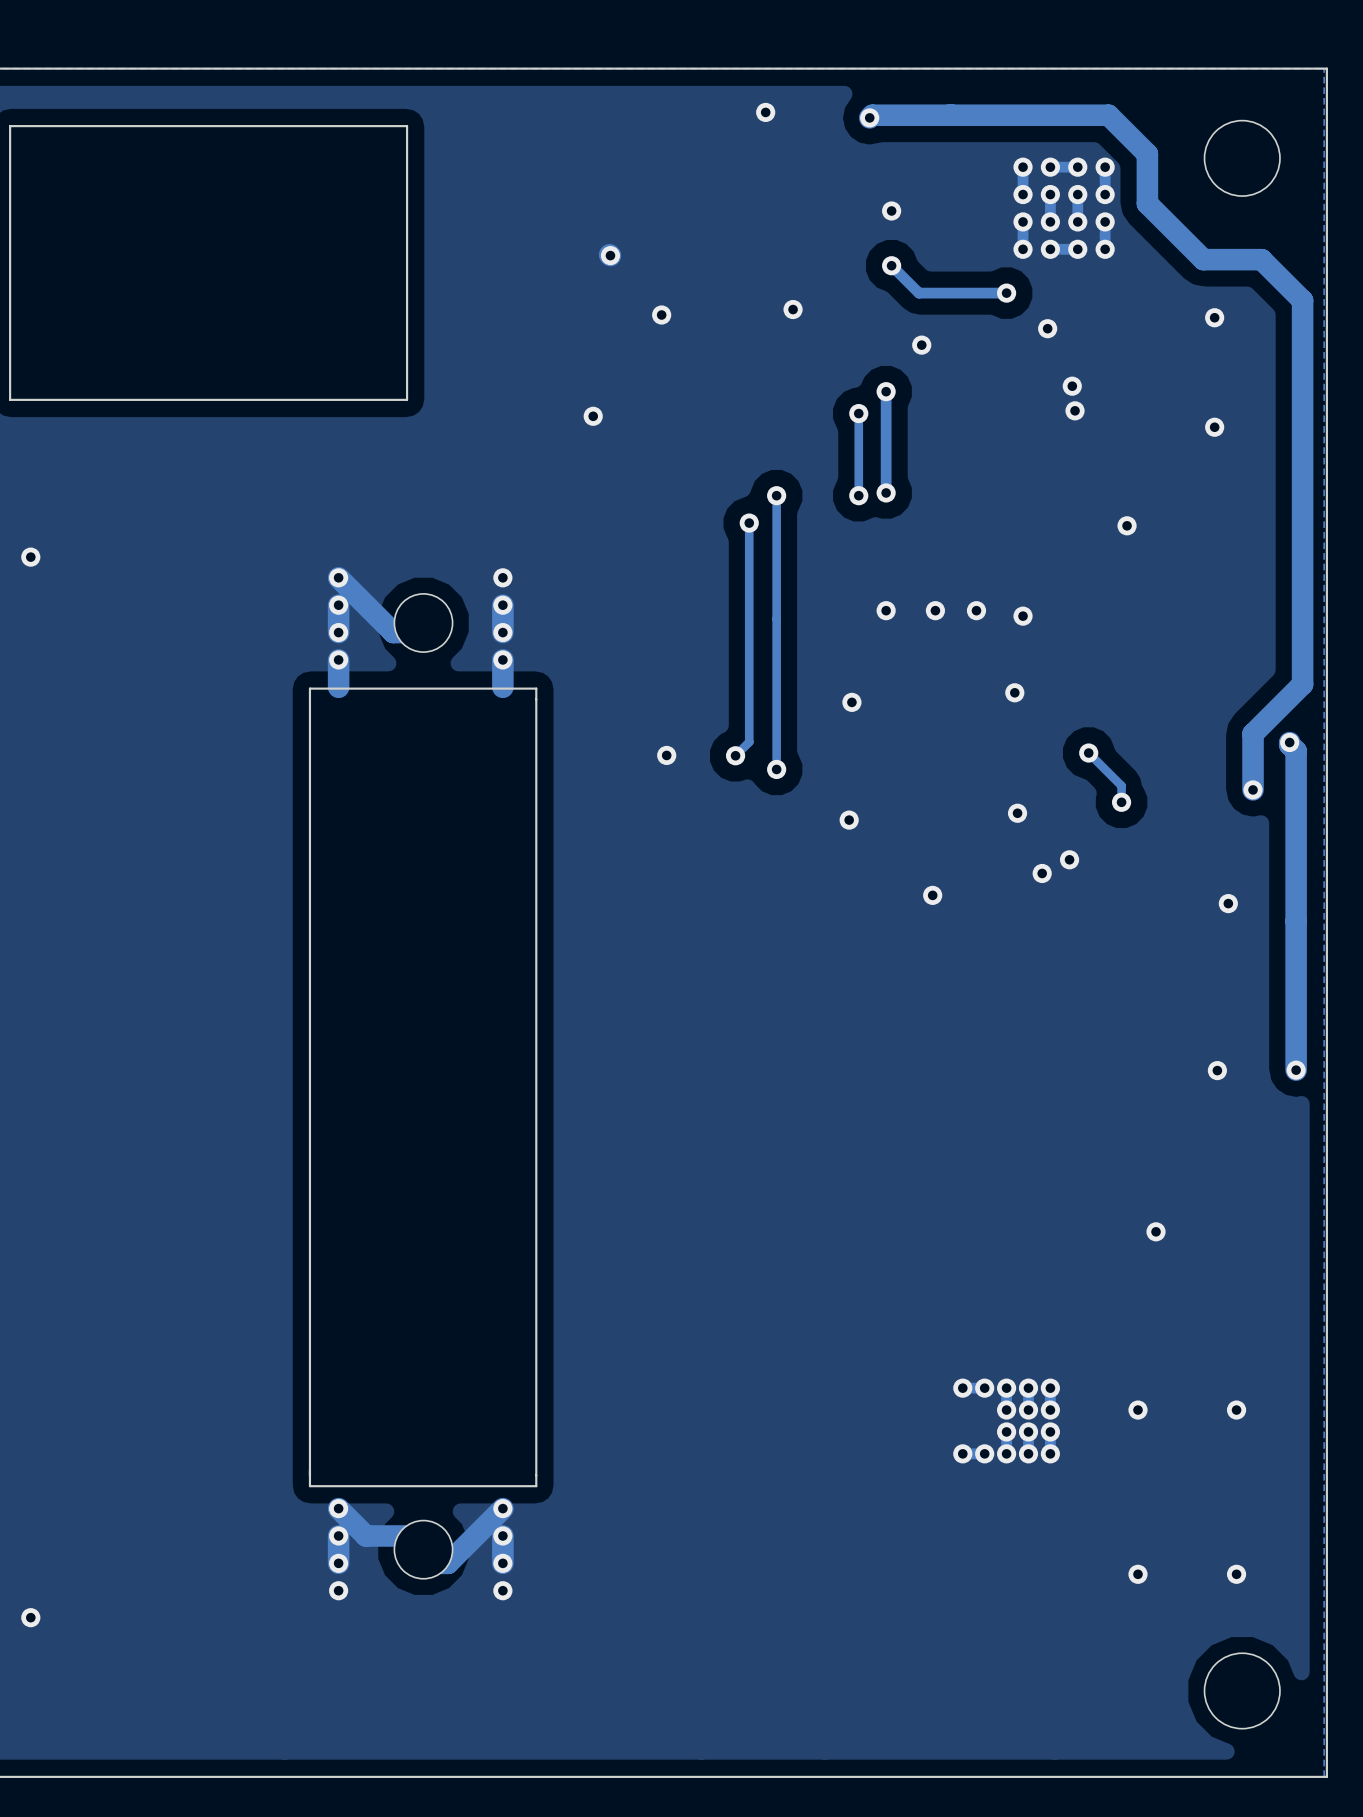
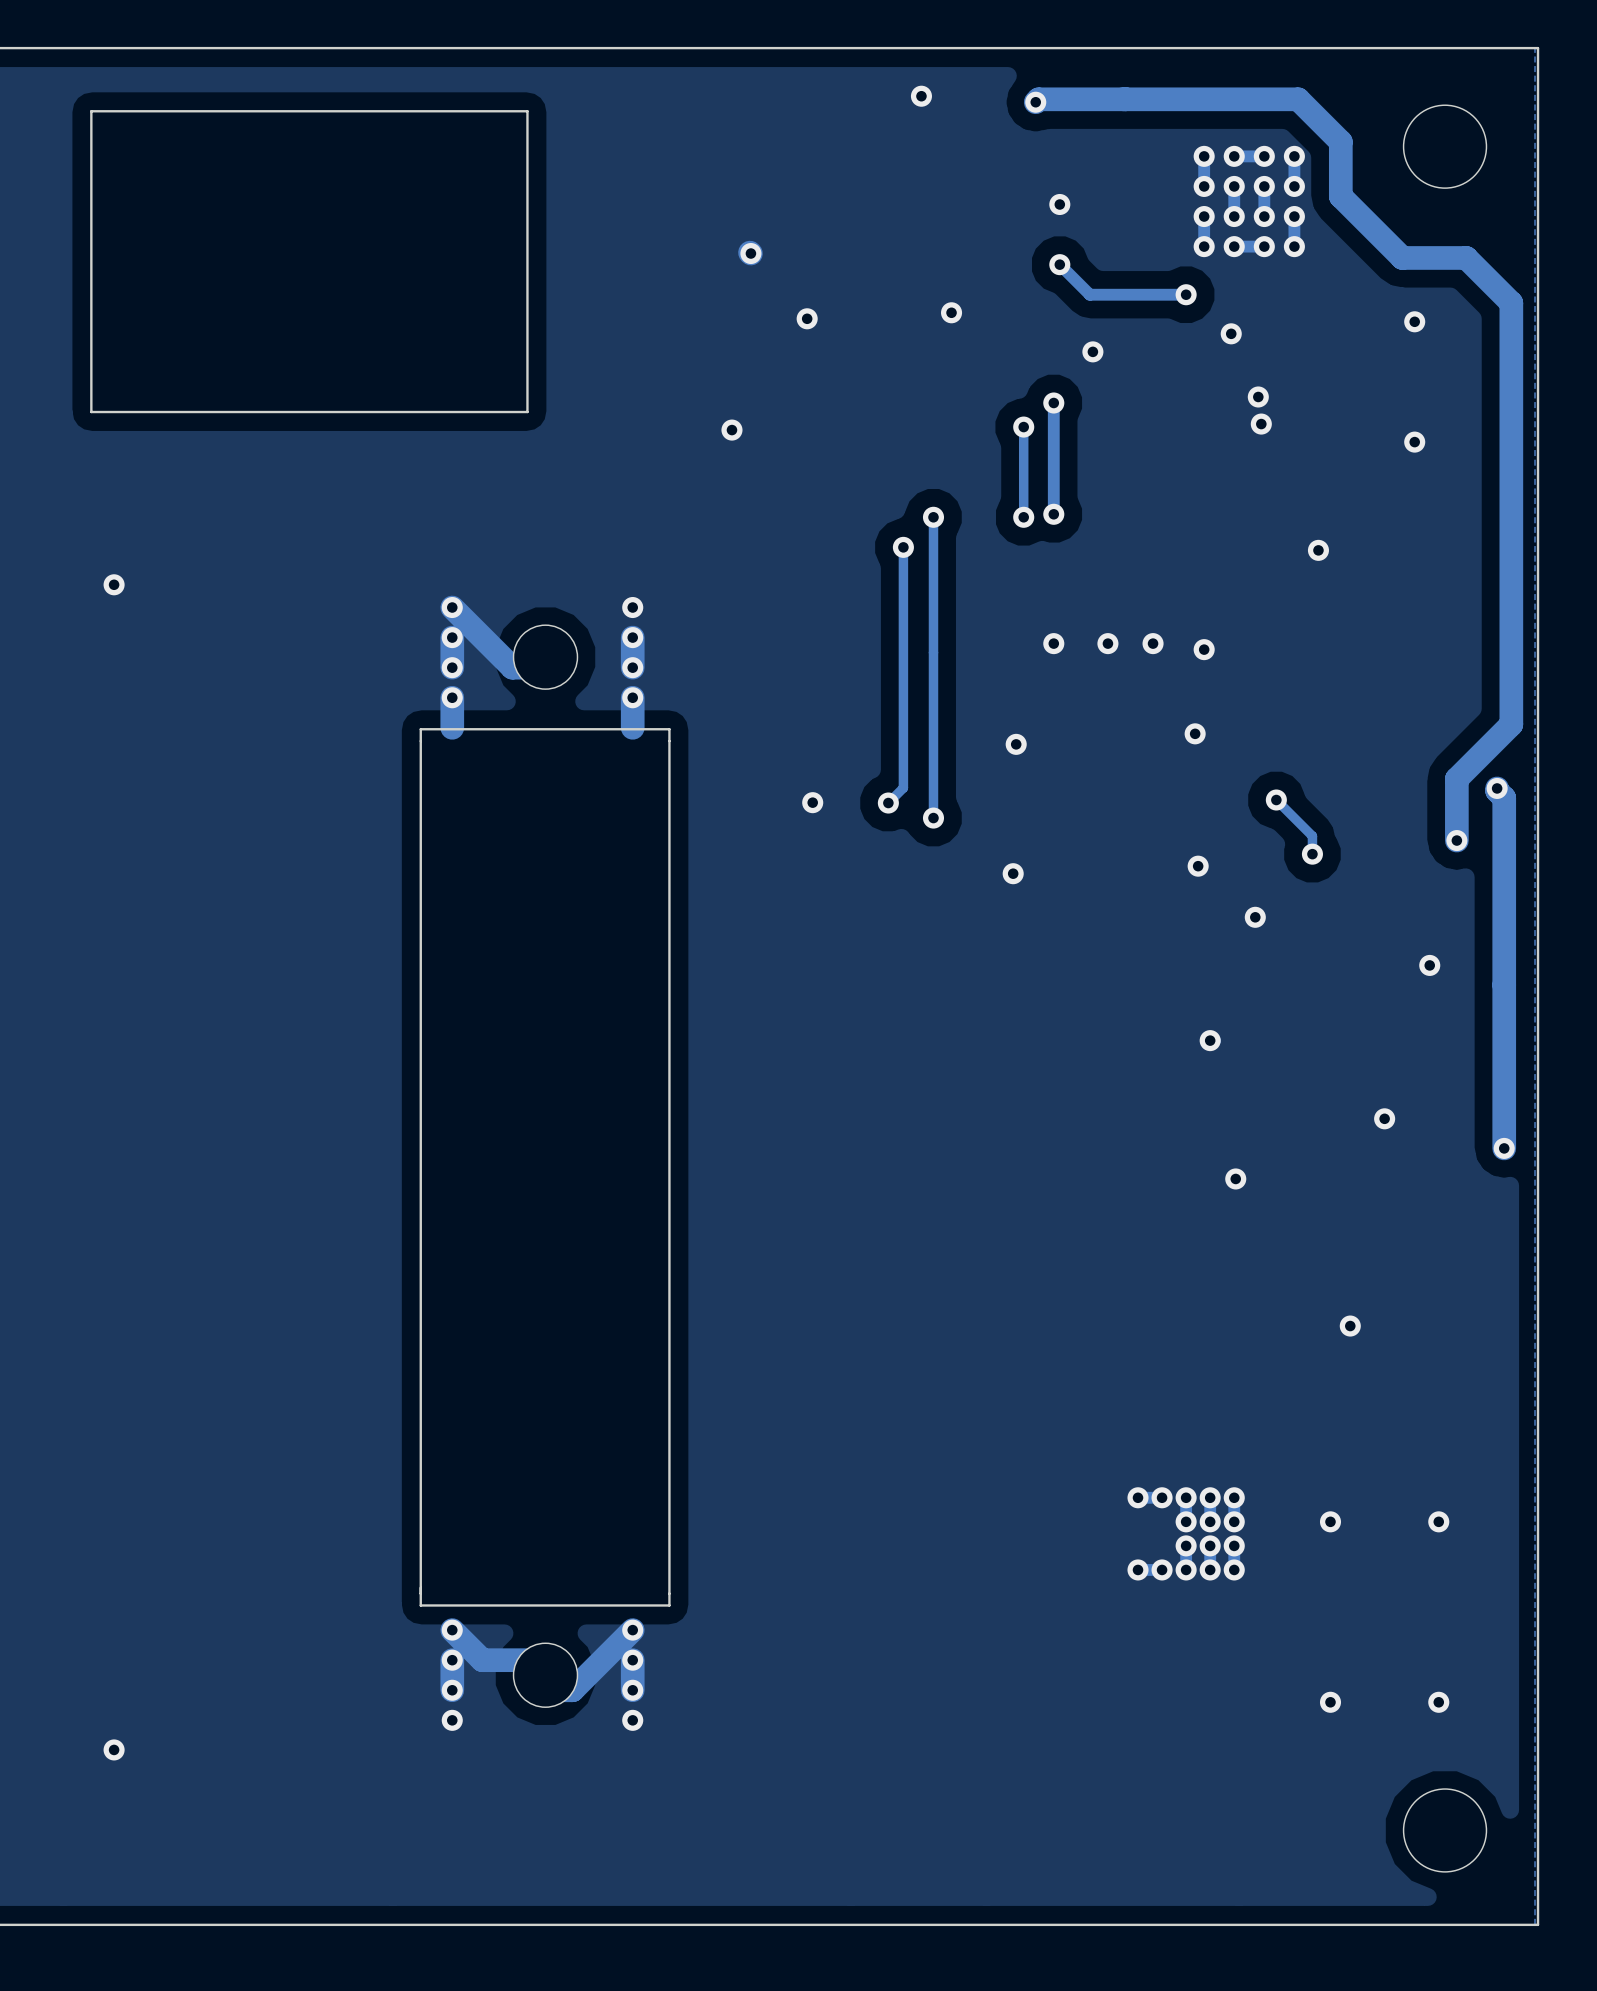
via: (1042, 873) -> none
via: (932, 895) -> none
via: none -> (1210, 1040)
via position: (1217, 1070) -> (1384, 1118)
via: none -> (1235, 1178)

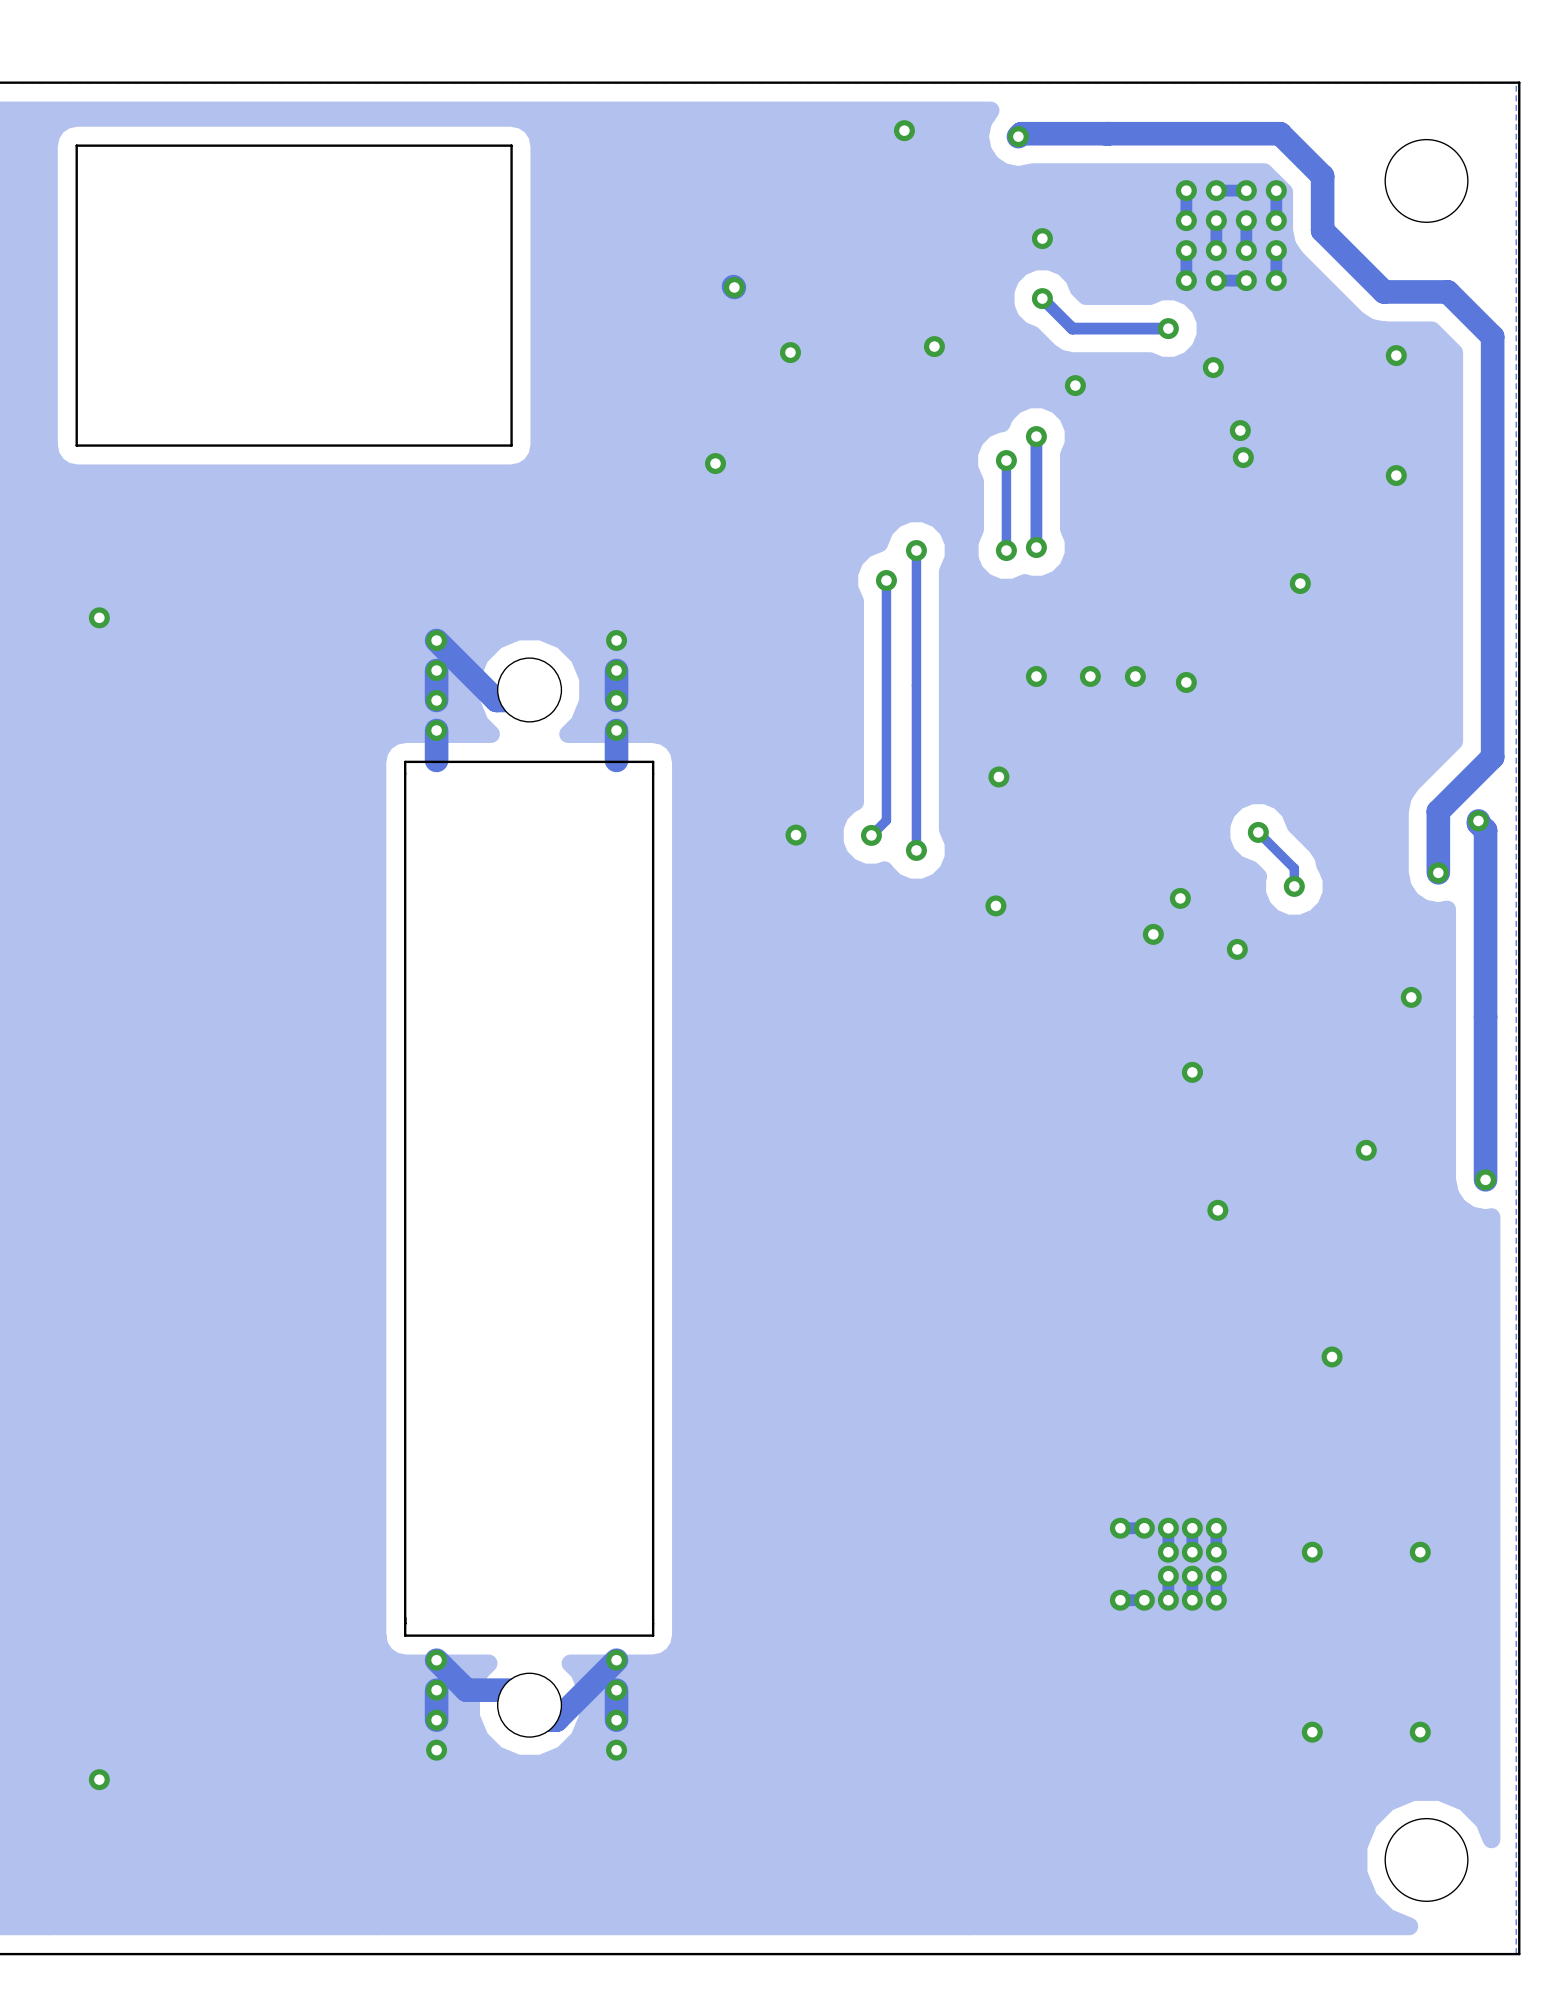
via: (1195, 733) -> none
via: none -> (1153, 934)

